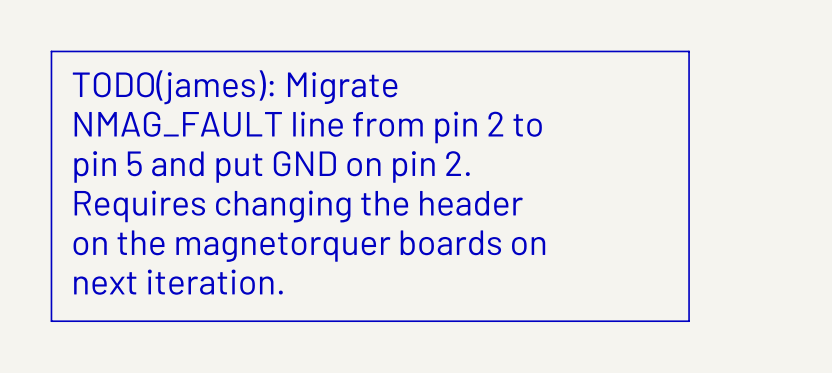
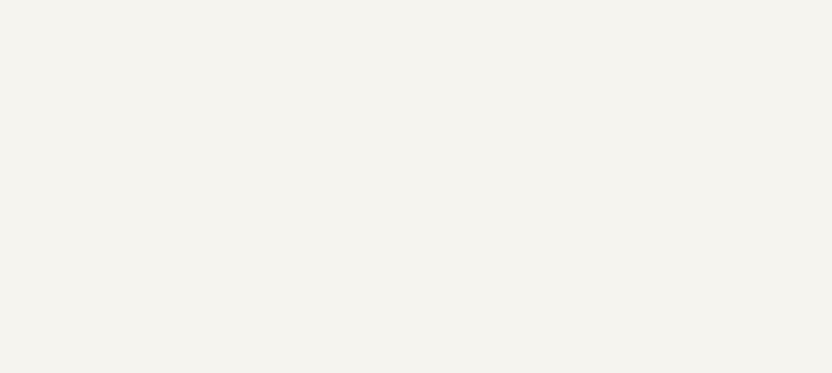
line: (51, 51) (689, 51) (689, 321) (51, 321) (51, 51) -> none
text: TODO(james): Migrate (235, 87) -> none
text: NMAG_FAULT line from pin 2 to (308, 127) -> none
text: pin 5 and put GND on pin 2. (272, 166) -> none
text: Requires changing the header (298, 206) -> none
text: on the magnetorquer boards on (309, 246) -> none
text: next iteration. (178, 282) -> none

